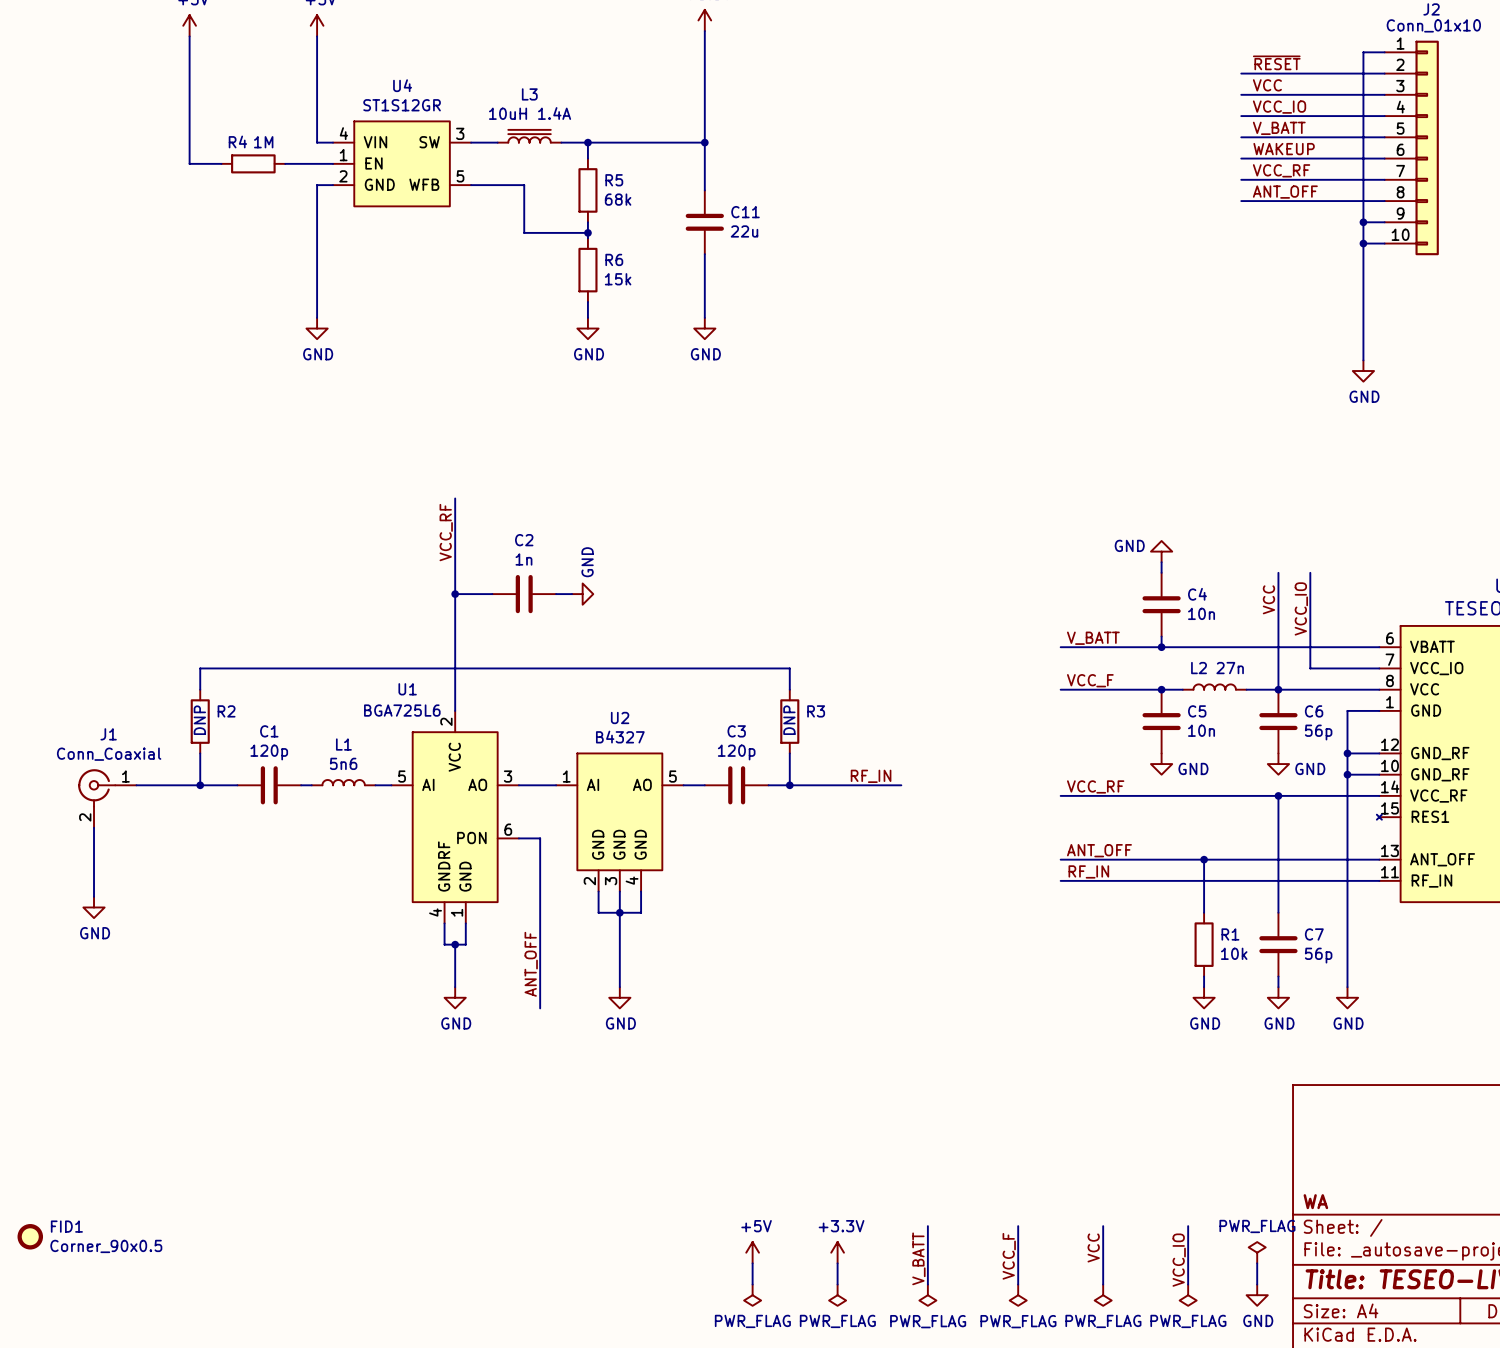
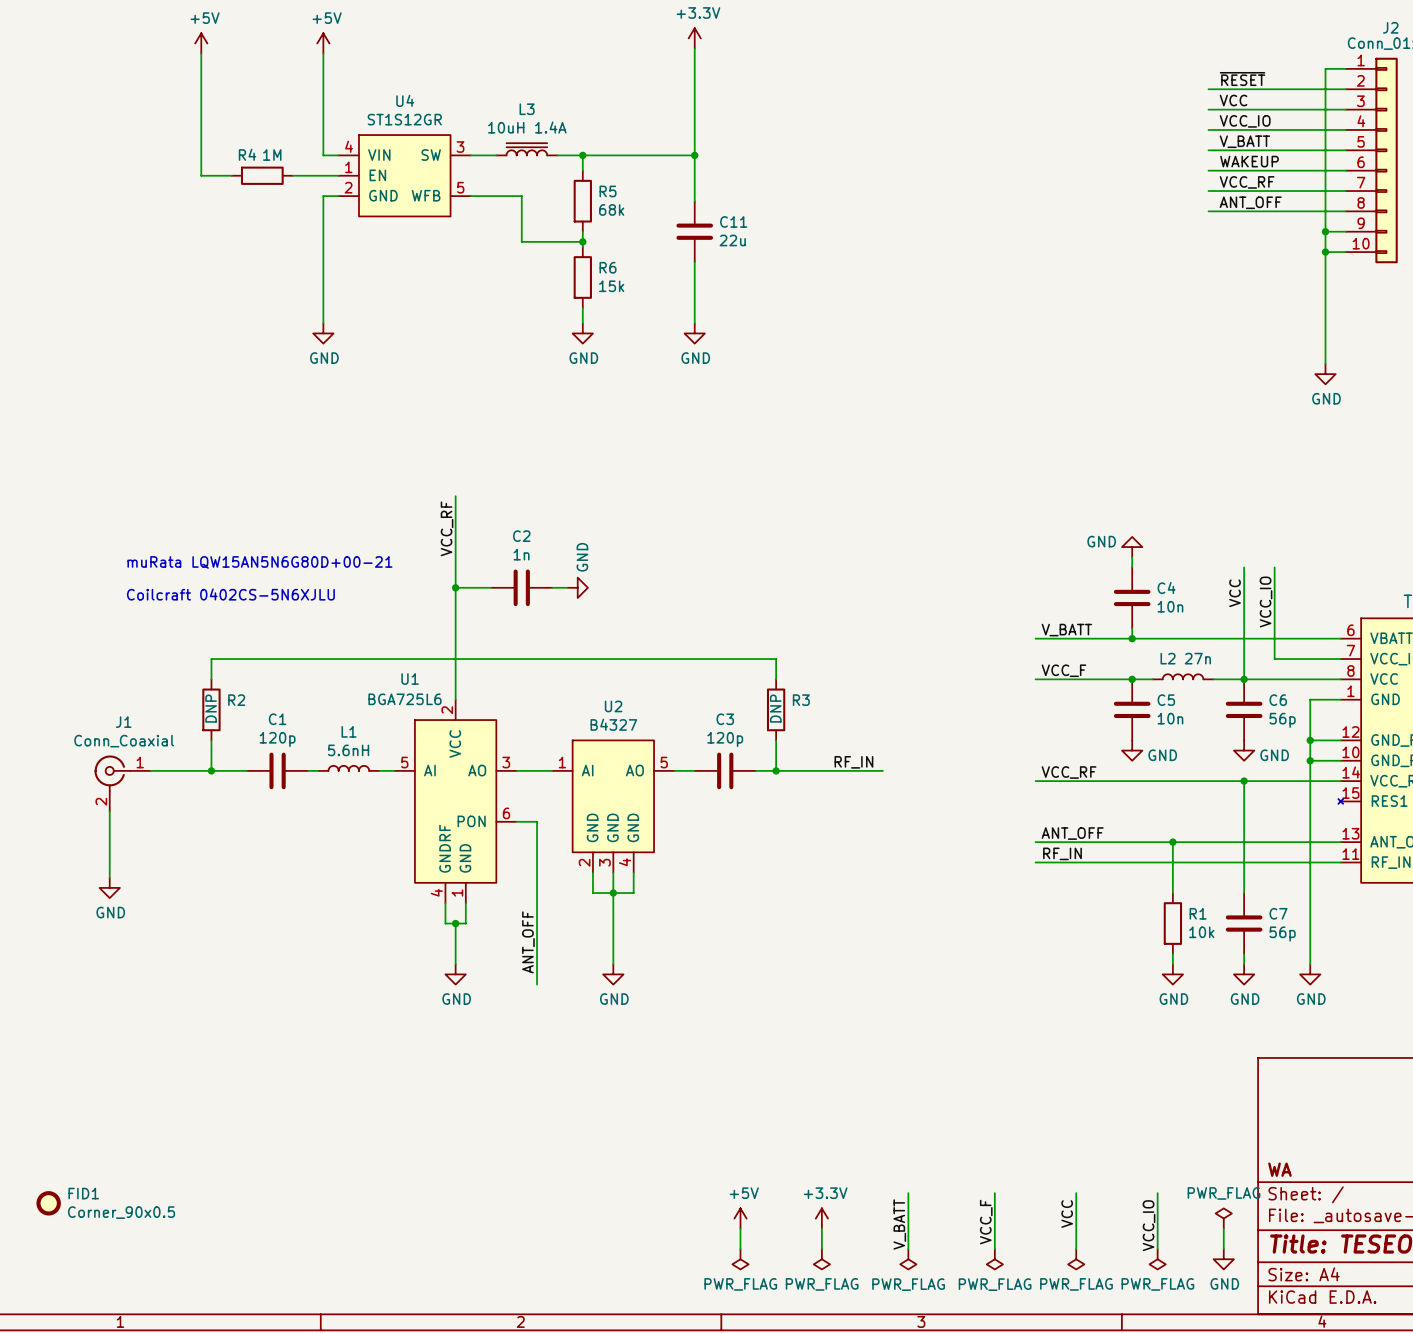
text: none -> muRata LQW15AN5N6G80D+00-21 (259, 562)
text: none -> Coilcraft 0402CS-5N6XJLU (230, 594)
L1 value: 5n6 (343, 763) -> 5.6nH (348, 750)

